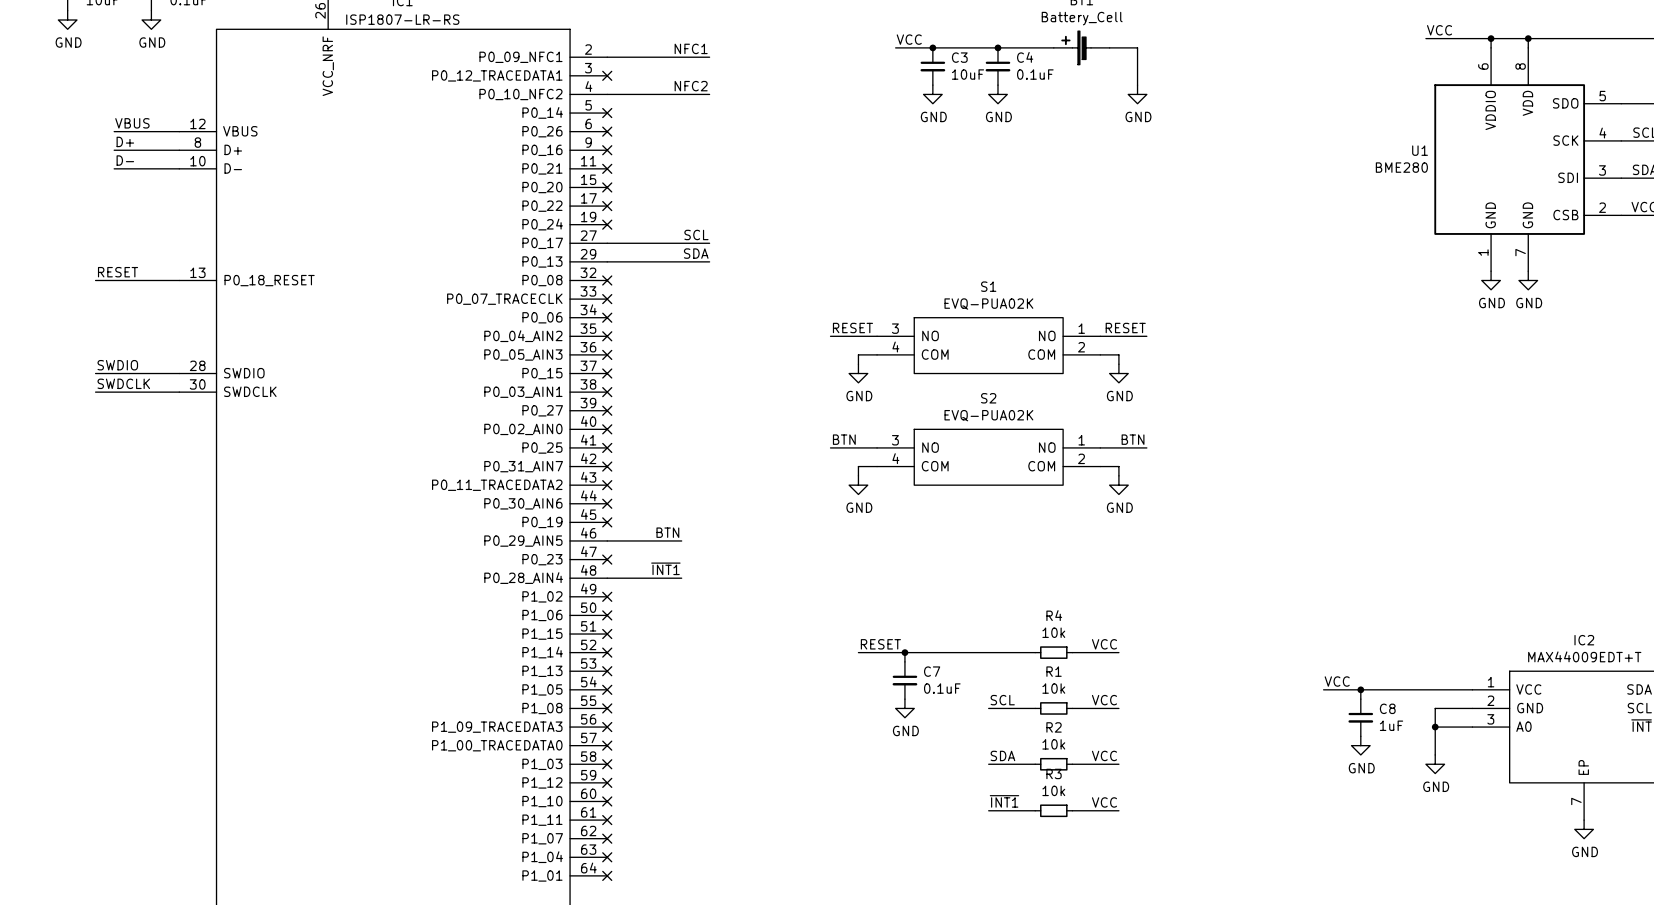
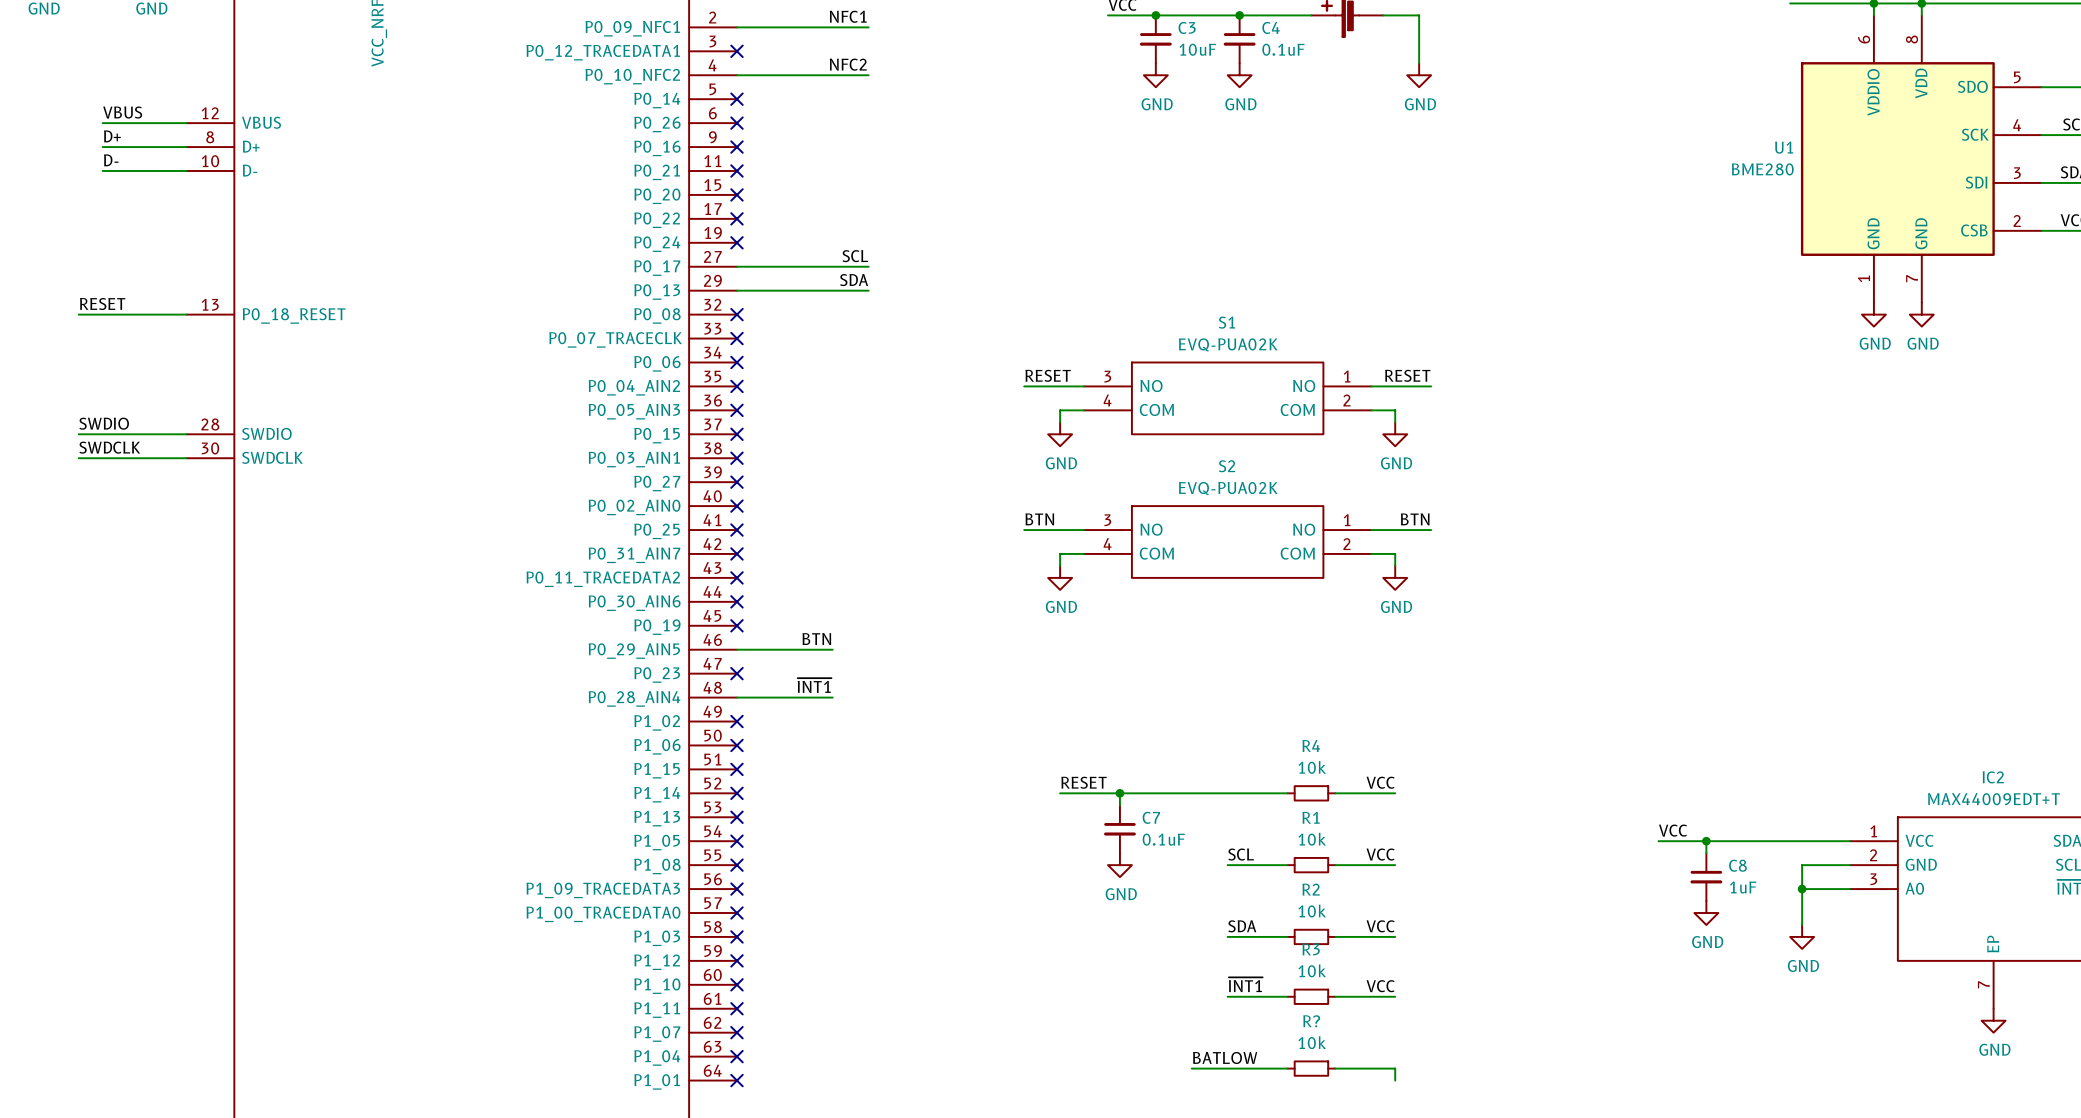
label: none -> BATLOW (1225, 1057)
wire: none -> (1191, 1068) (1287, 1068)
R?: none -> 10k (1311, 1068)
wire: none -> (1335, 1068) (1395, 1068) (1395, 1080)

